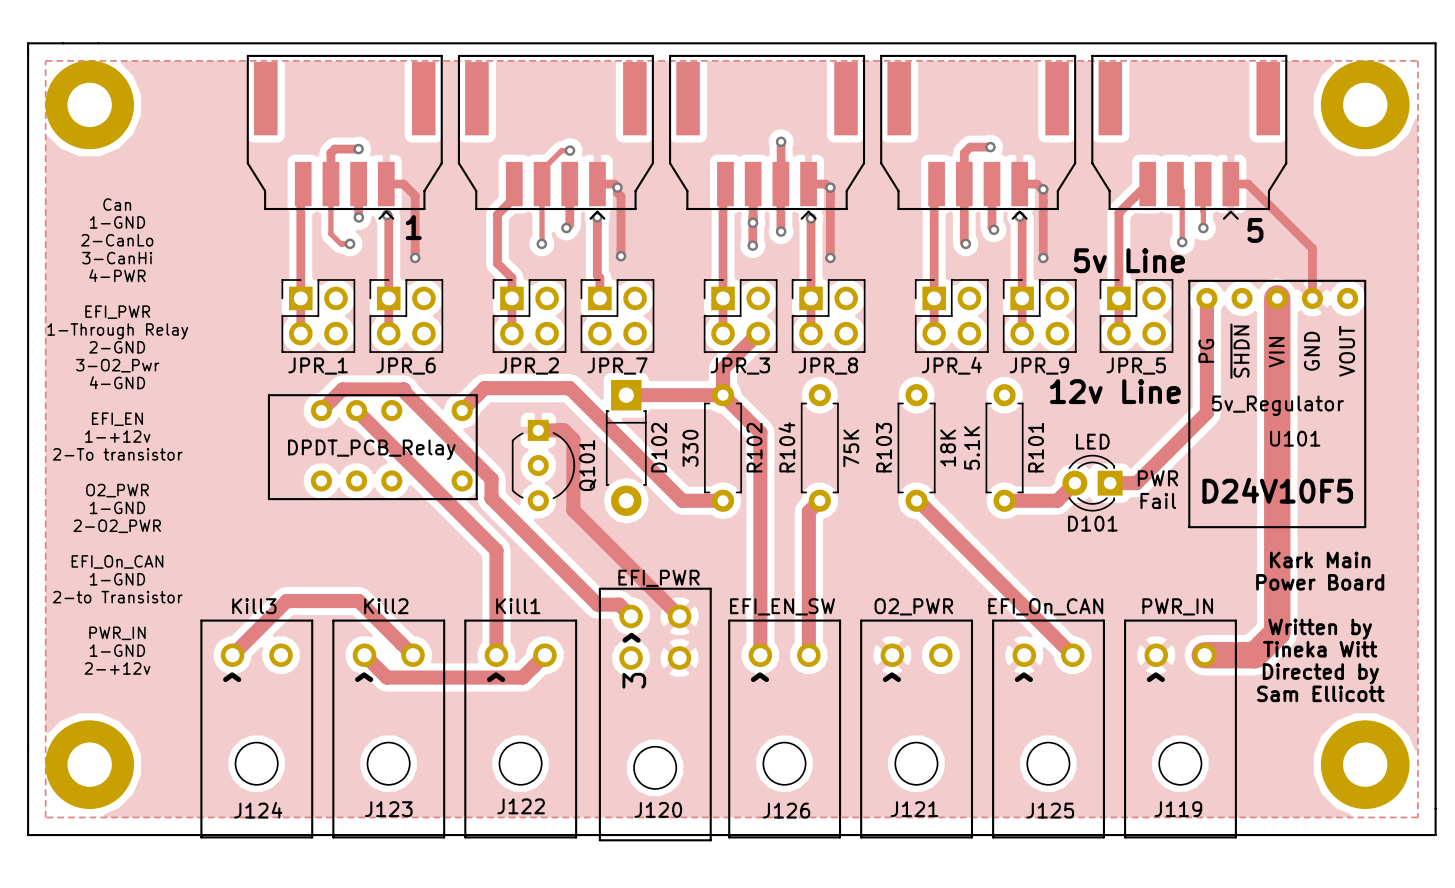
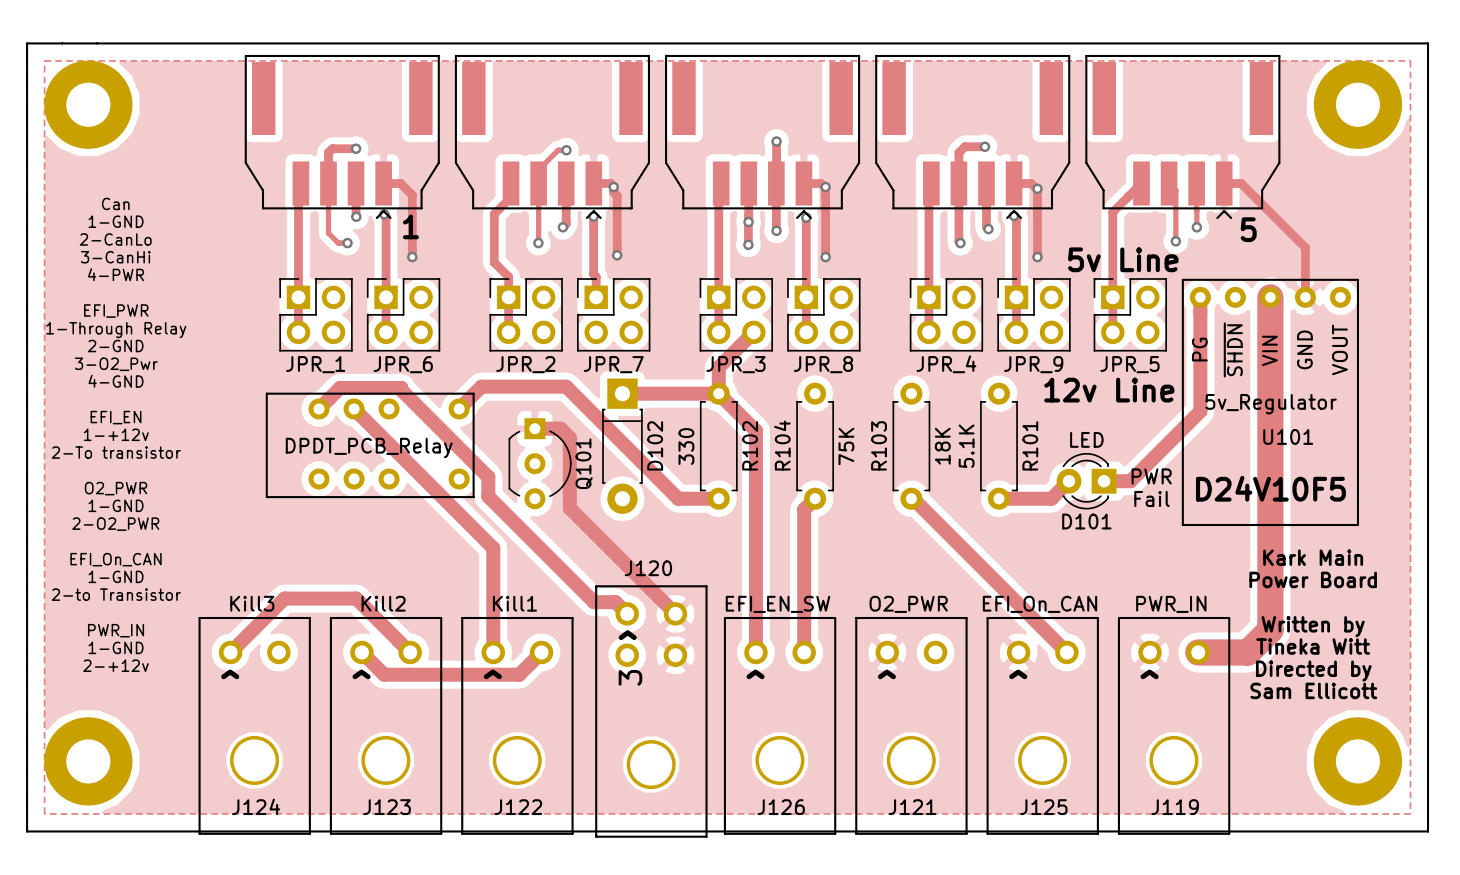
J120 value: EFI_PWR (658, 578) -> none
J120 footprint: [598, 587, 712, 842] -> [595, 585, 708, 838]
J124 footprint: [200, 619, 314, 839] -> [198, 616, 311, 835]
J123 footprint: [332, 619, 446, 839] -> [329, 616, 443, 835]
J122 footprint: [464, 619, 578, 839] -> [461, 616, 574, 835]
J126 footprint: [728, 619, 842, 839] -> [723, 616, 837, 835]
J121 footprint: [860, 619, 974, 839] -> [855, 616, 968, 835]
J125 footprint: [992, 619, 1105, 839] -> [986, 616, 1099, 835]
J119 footprint: [1124, 619, 1237, 839] -> [1117, 616, 1231, 835]
J120 name position: J120 (658, 809) -> J120 (648, 568)

